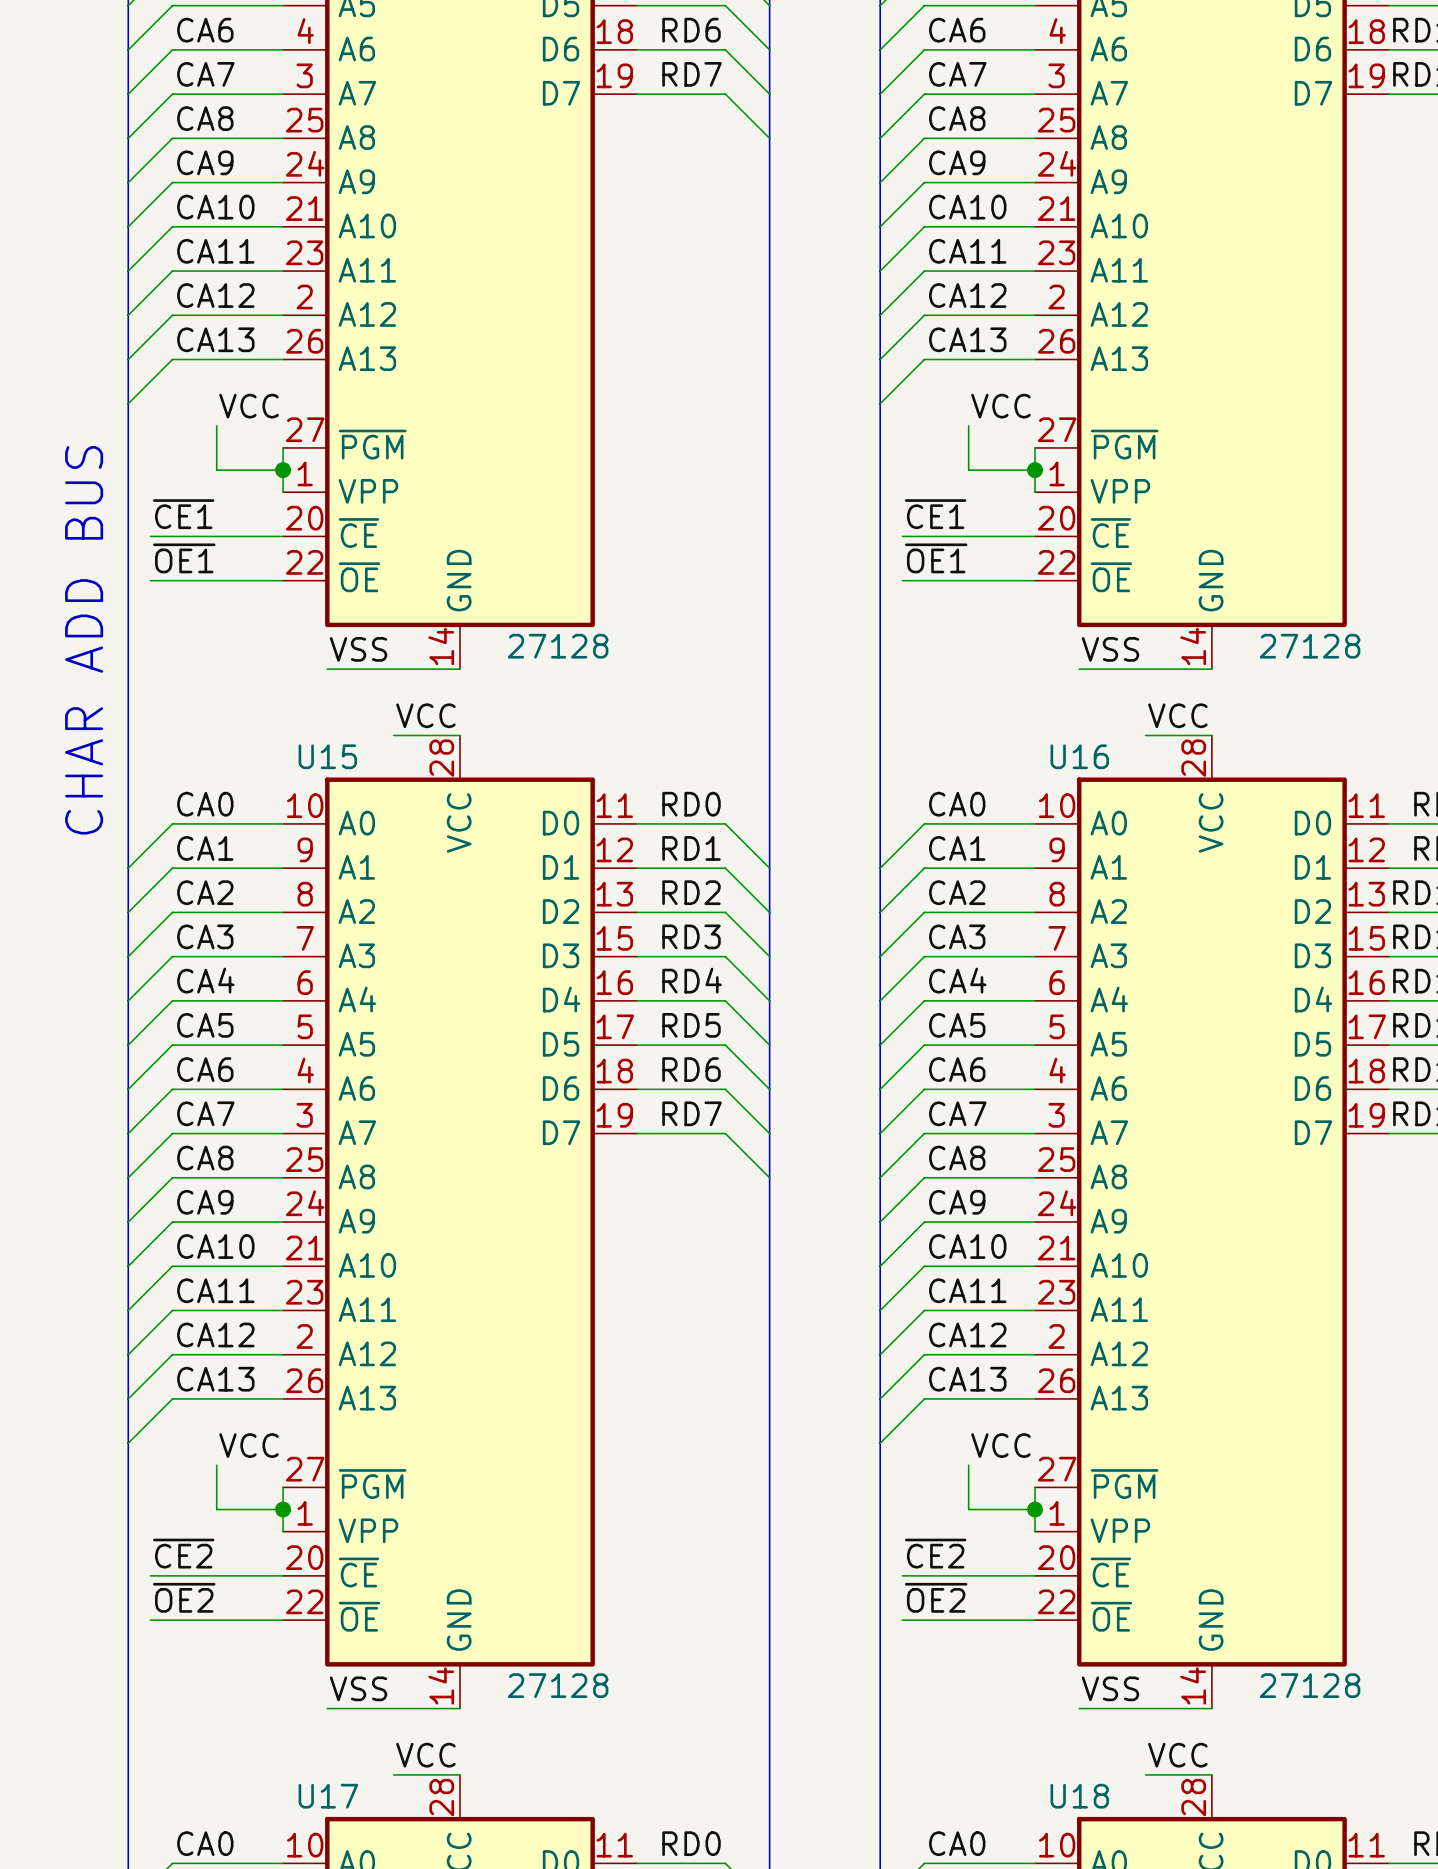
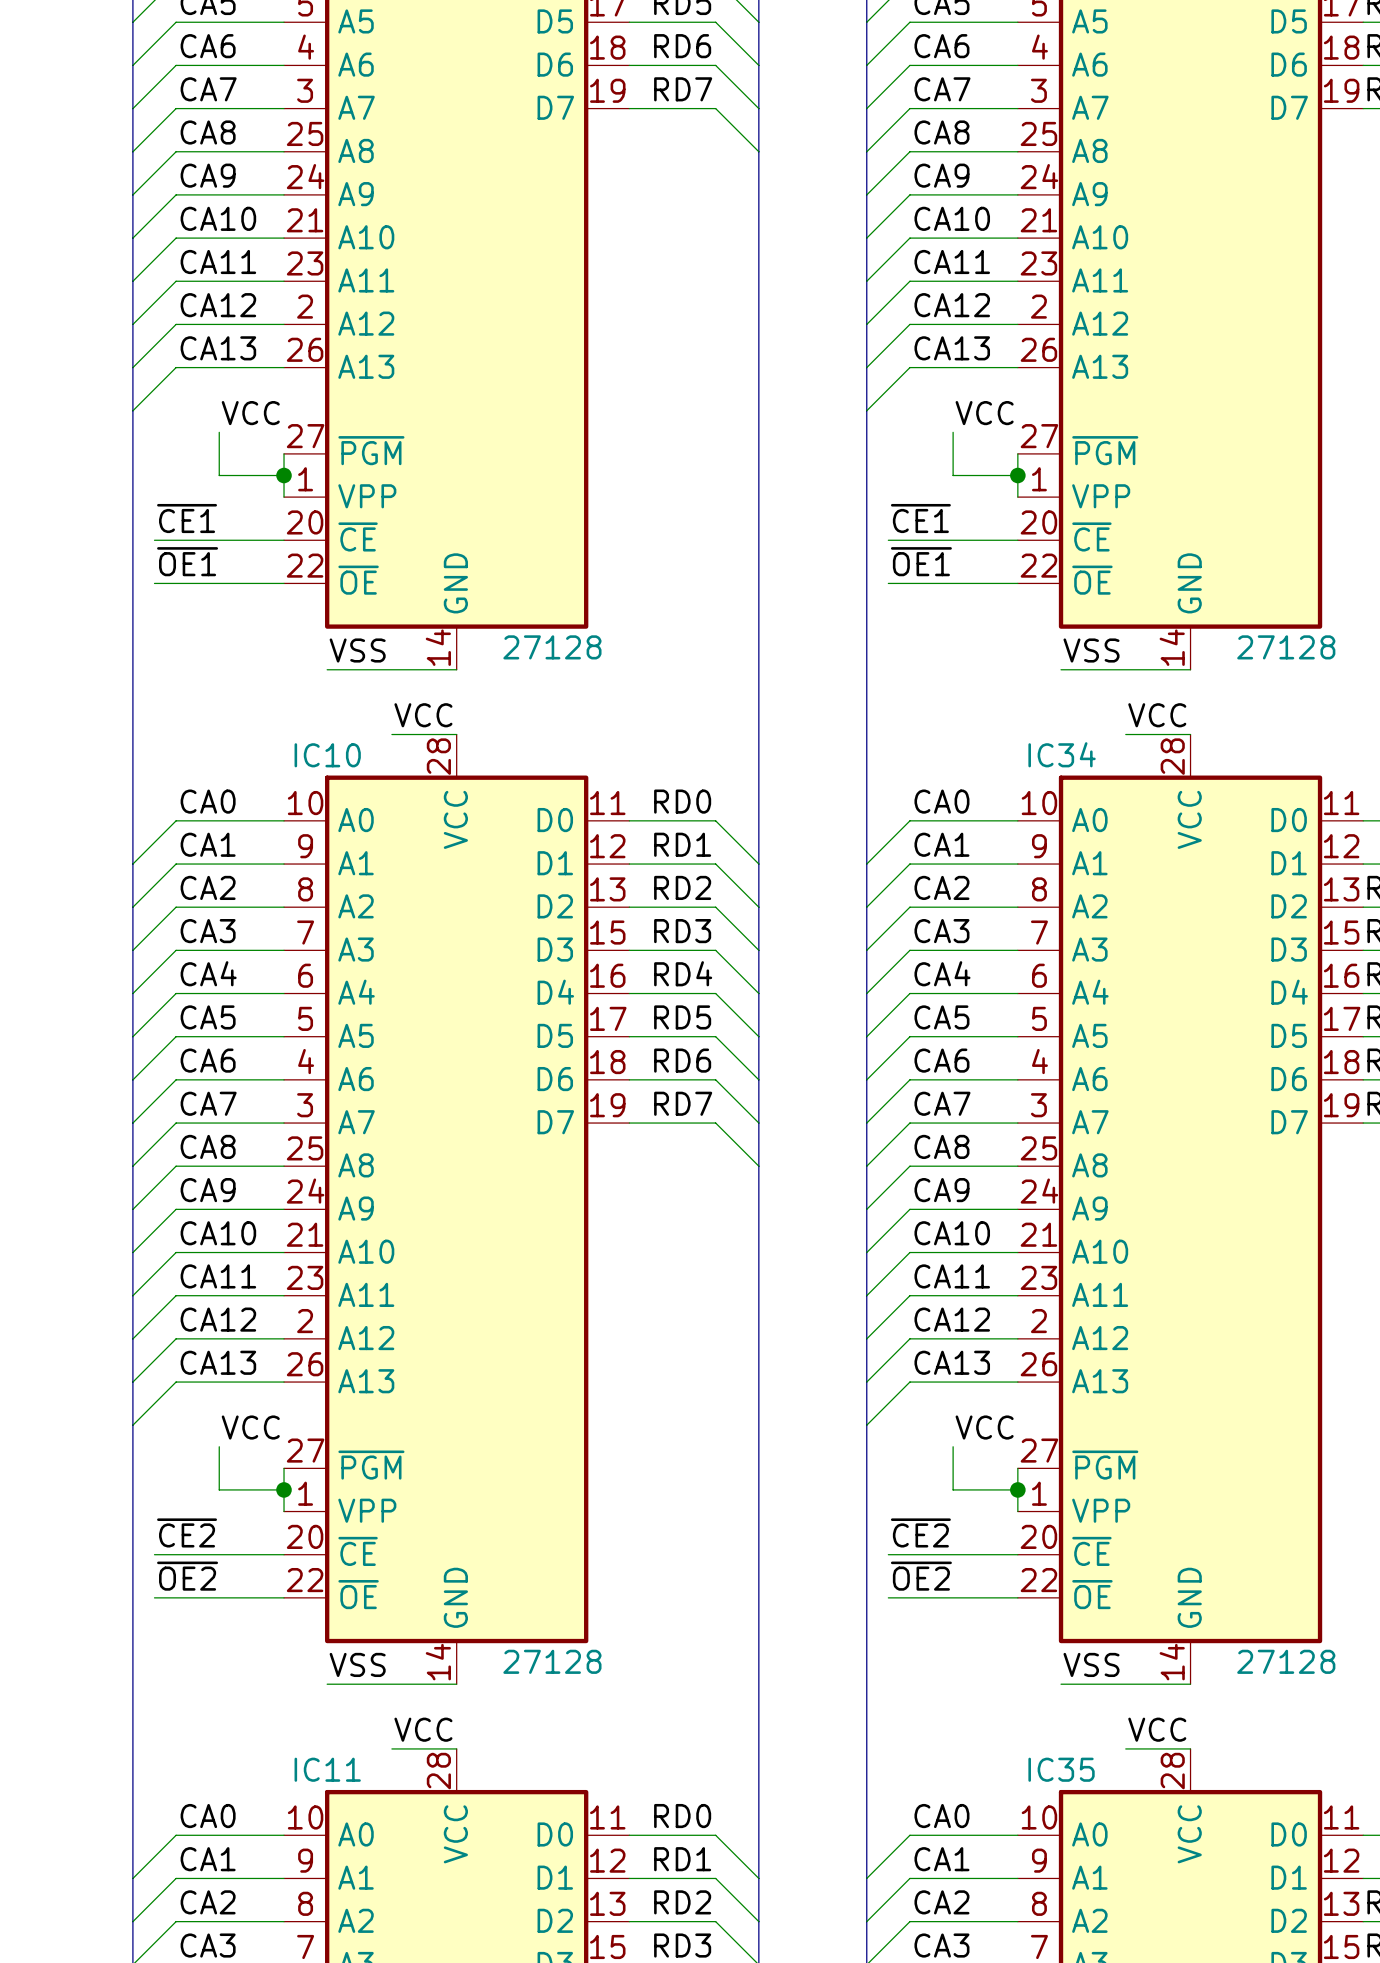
text: CHAR ADD BUS (84, 640) -> none
U15 name: U15 (327, 756) -> IC10 (327, 755)
U16 name: U16 (1079, 756) -> IC34 (1062, 754)
U17 name: U17 (328, 1796) -> IC11 (327, 1769)
U18 name: U18 (1079, 1796) -> IC35 (1061, 1769)

